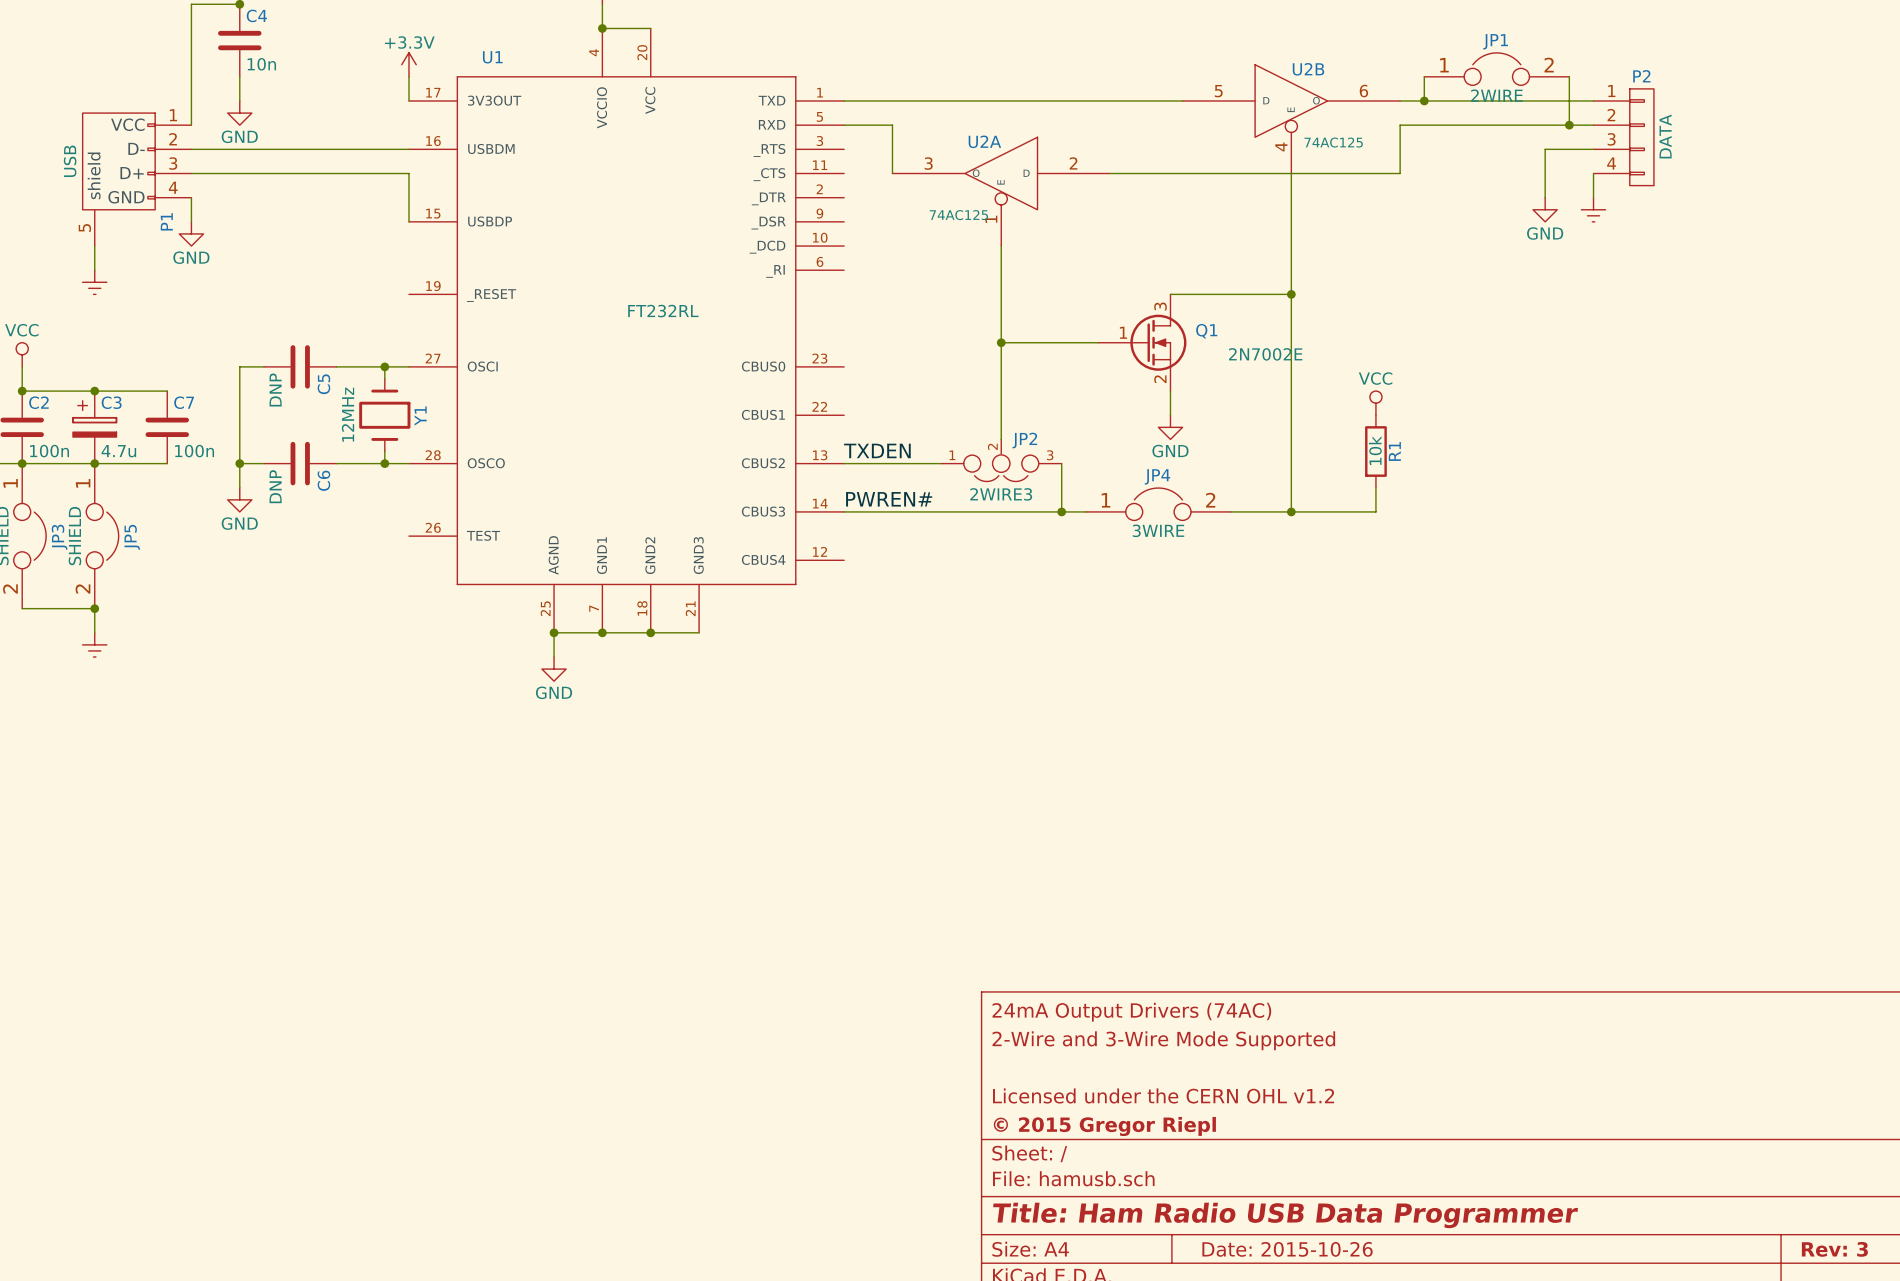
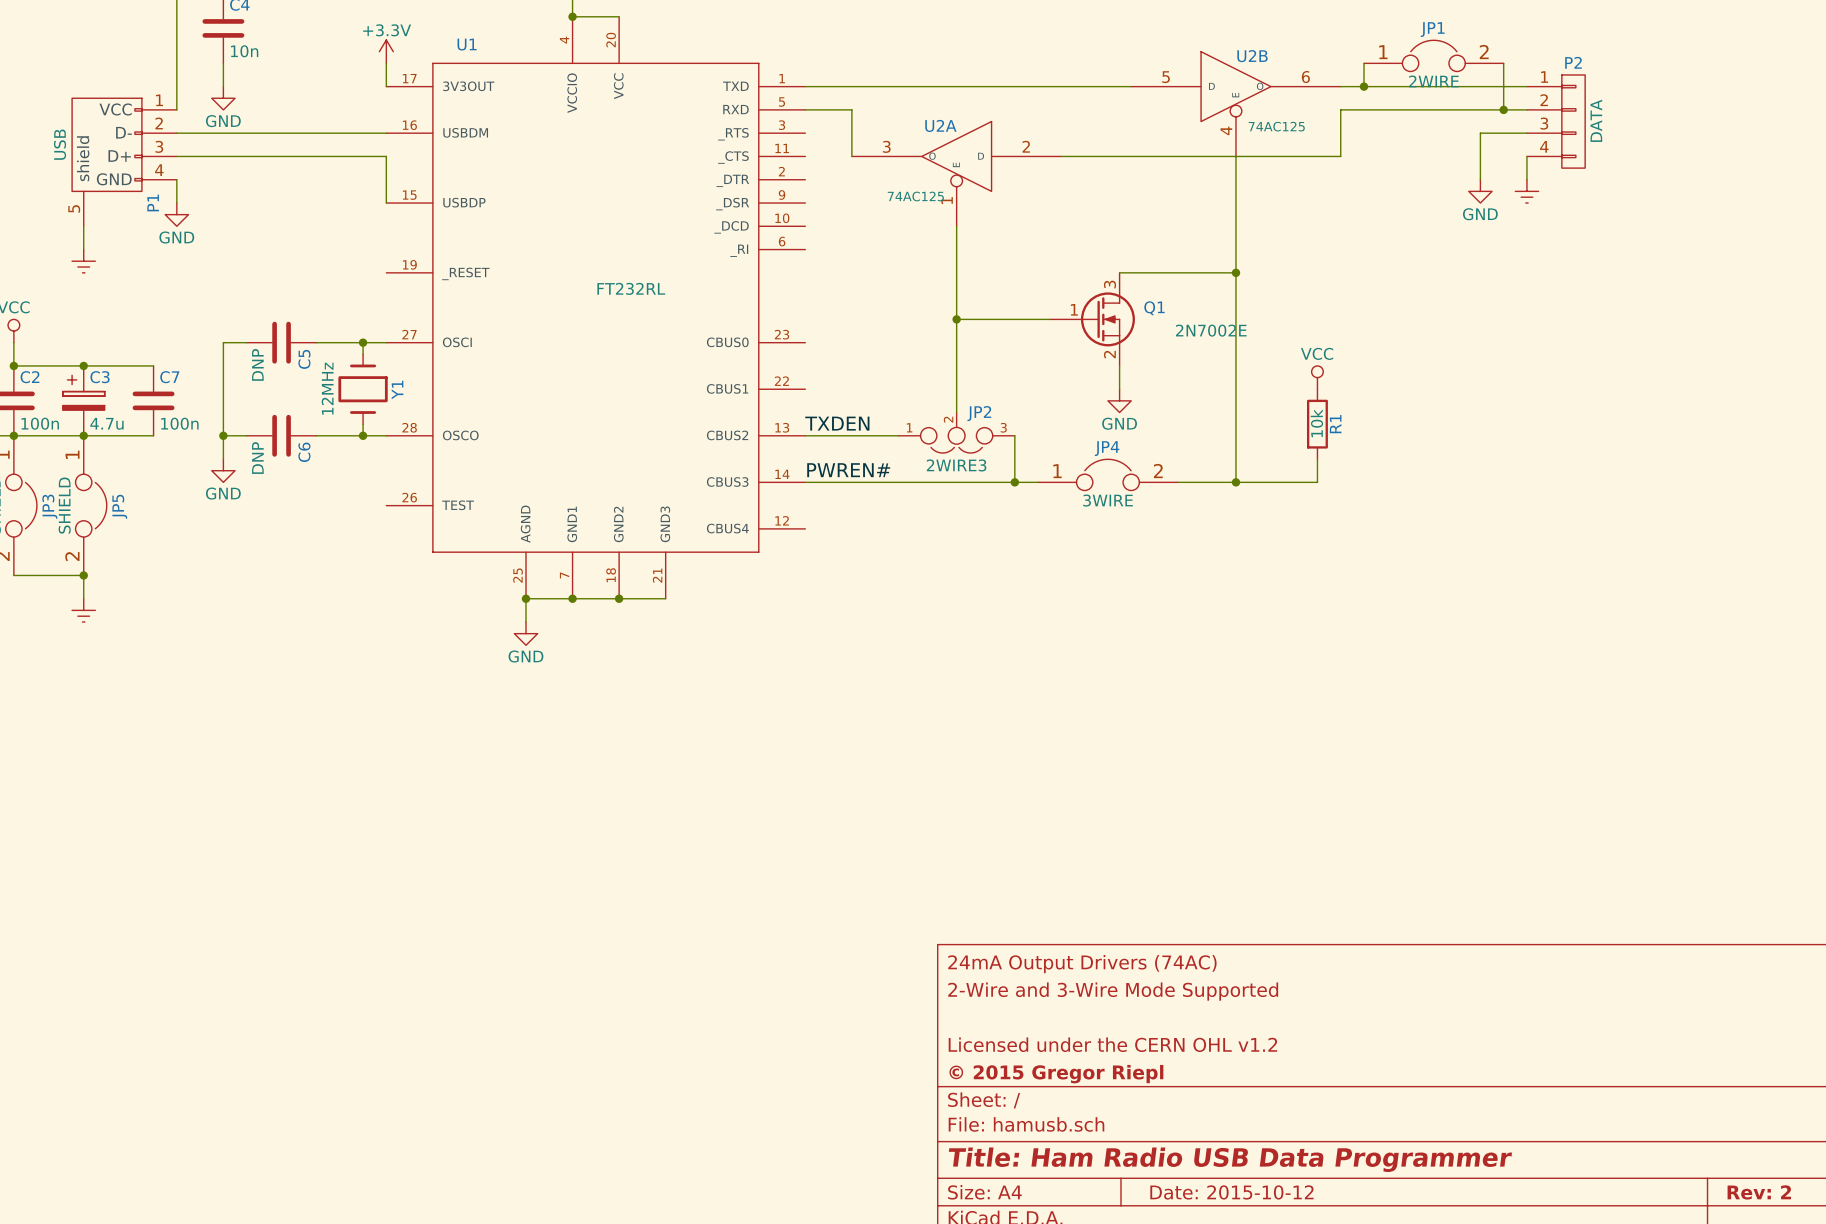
title block: Date: 2015-10-26 (1287, 1249) -> Date: 2015-10-12 (1231, 1192)
title block: Rev: 3 (1834, 1249) -> Rev: 2 (1759, 1192)

